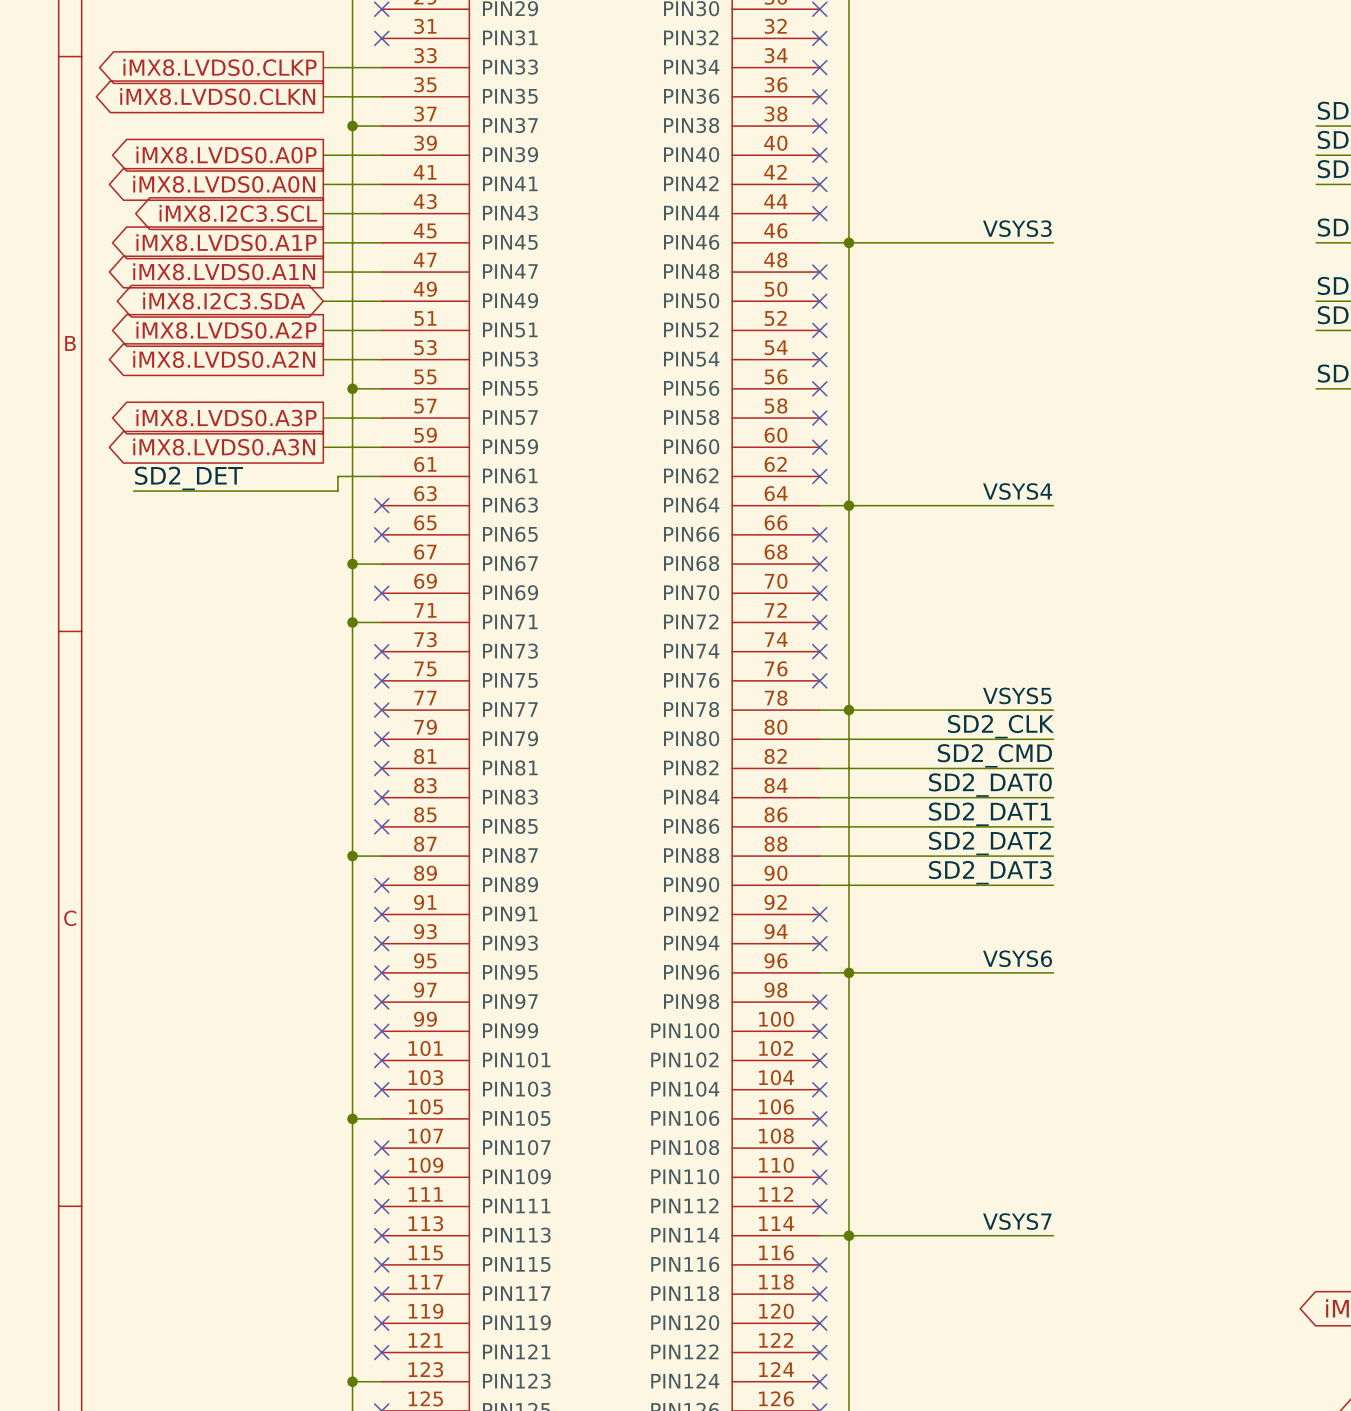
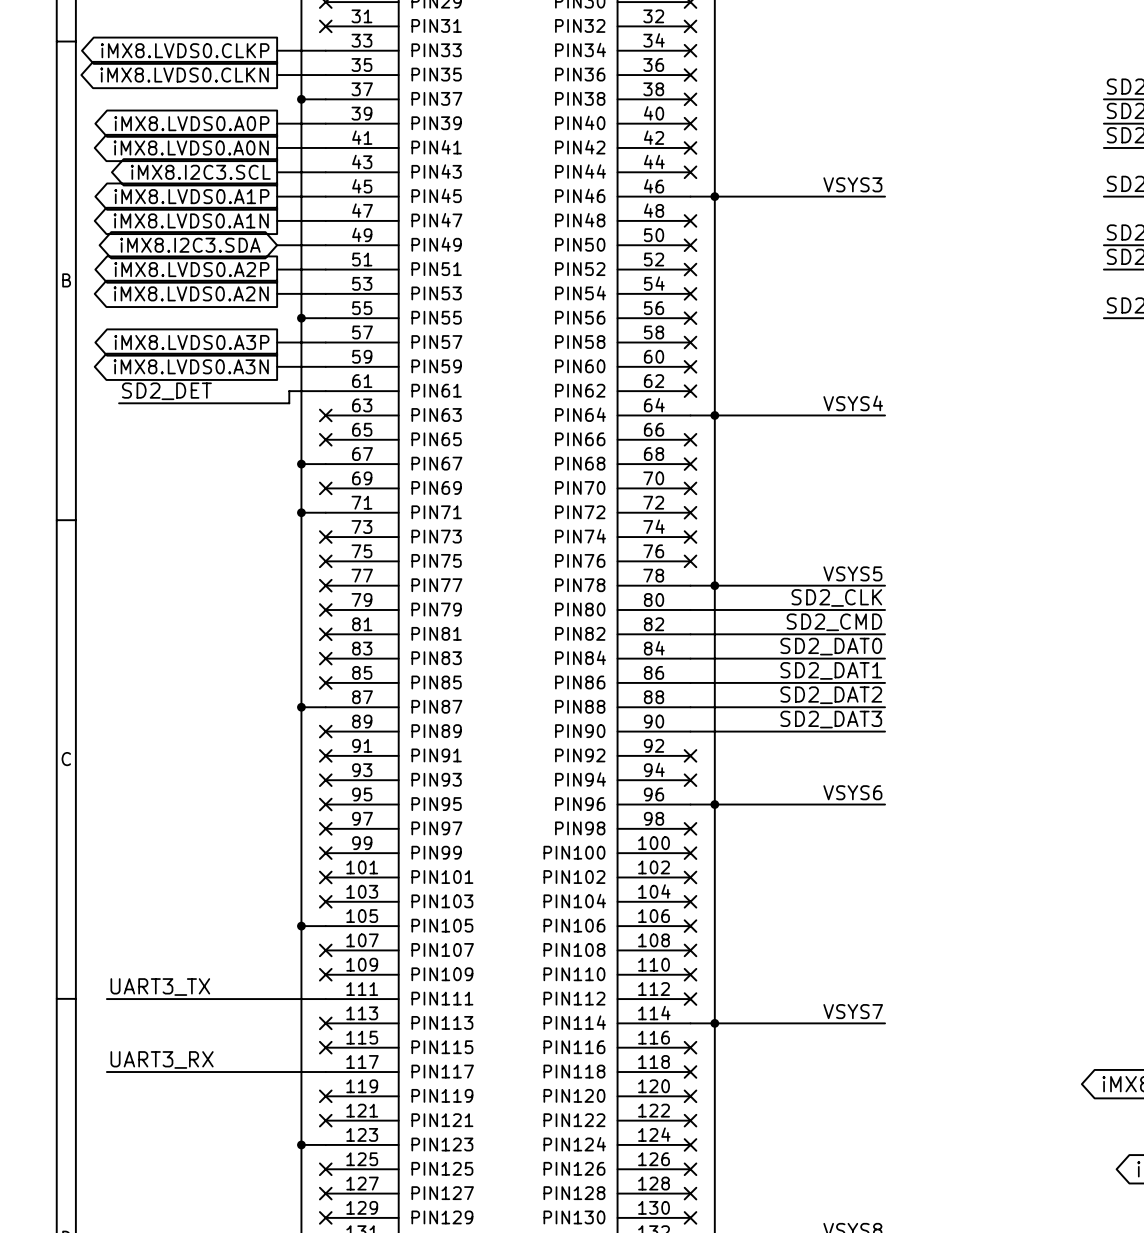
label: none -> UART3_TX (160, 987)
wire: none -> (106, 999) (325, 999)
no-connect mark: (381, 1206) -> none
label: none -> UART3_RX (162, 1059)
wire: none -> (106, 1072) (325, 1072)
no-connect mark: (381, 1294) -> none

